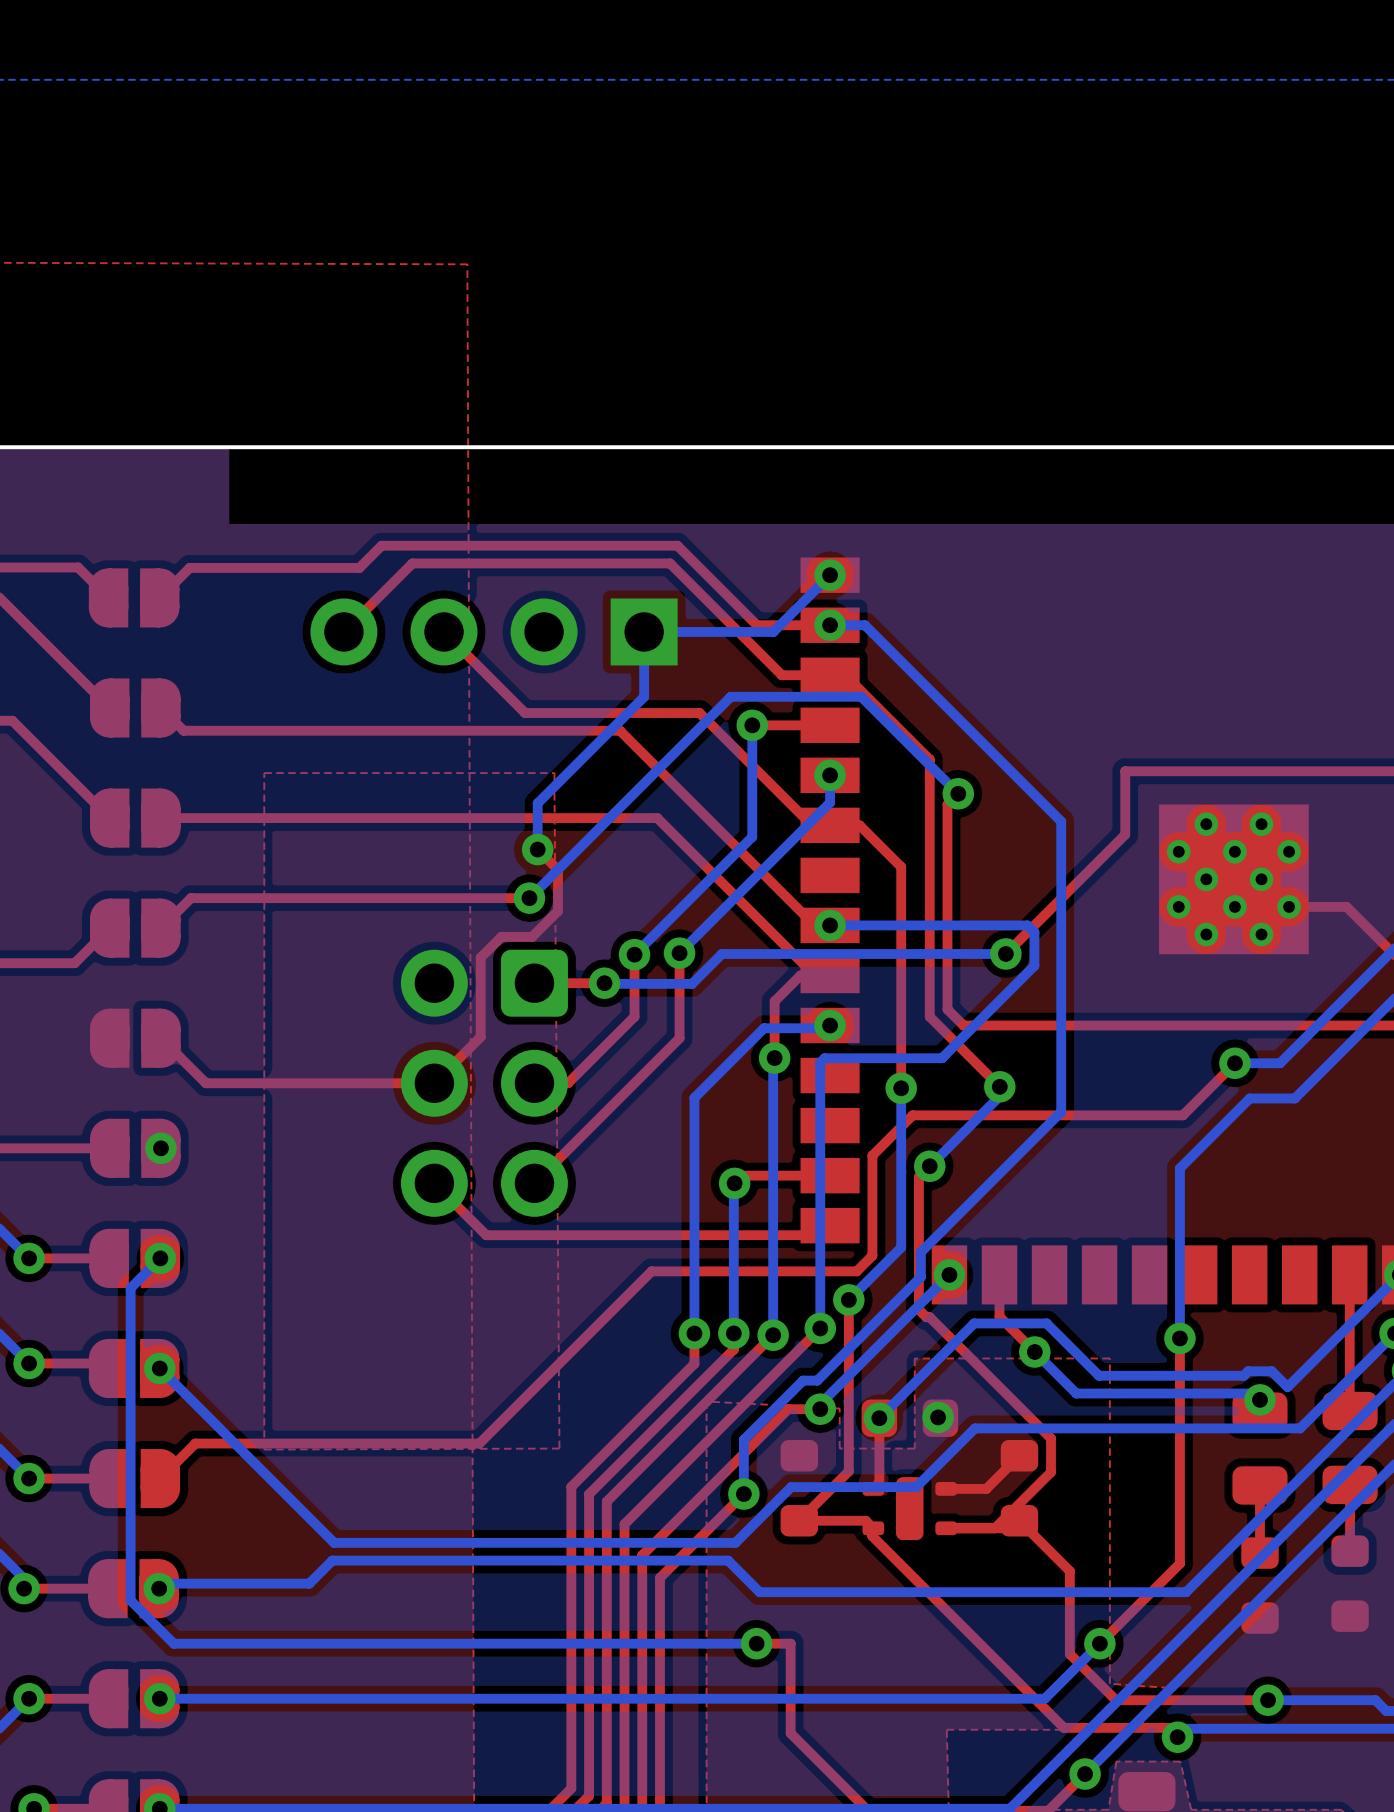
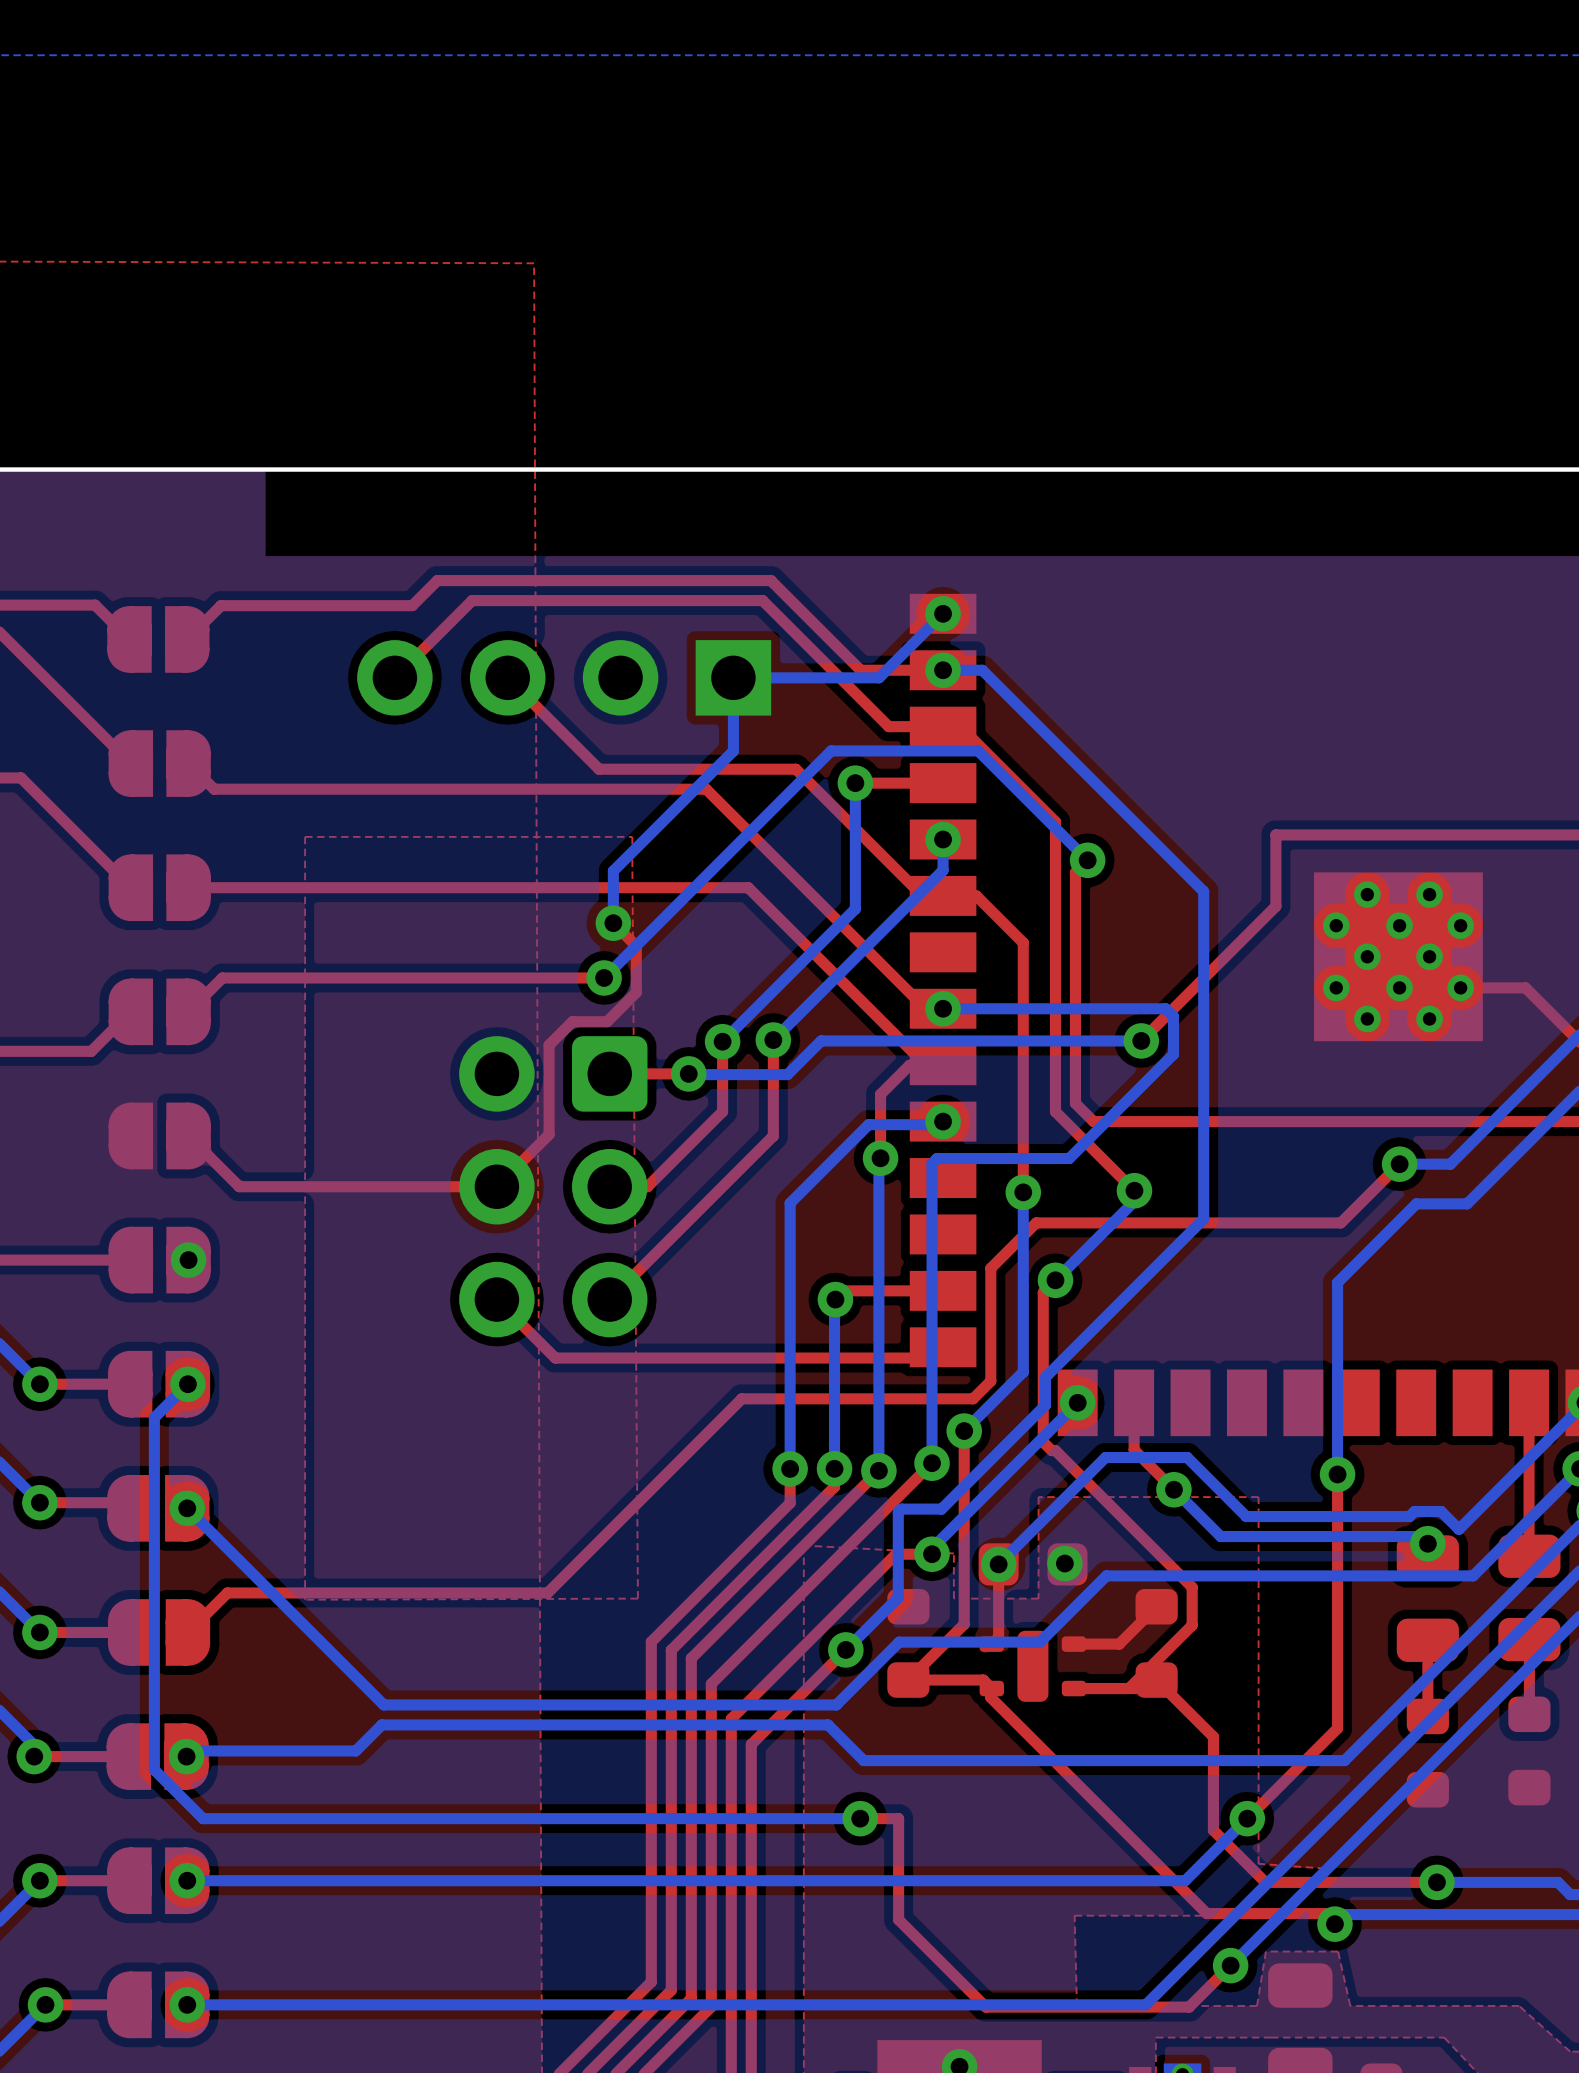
bottom track: (828, 1369) (817, 1380) (803, 1380) (743, 1439) (743, 1494) -> (941, 1509) (901, 1509) (898, 1512) (898, 1597) (845, 1649)

